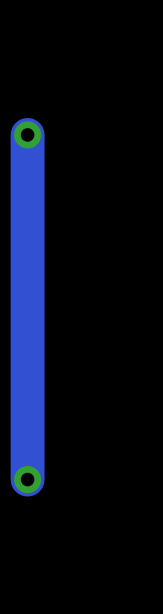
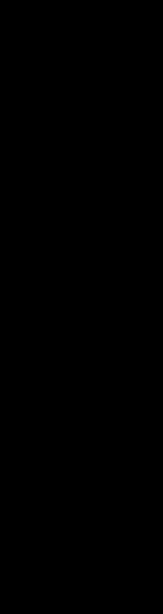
track: (27, 134) (27, 479) -> none
via: (27, 134) -> none
via: (27, 479) -> none

